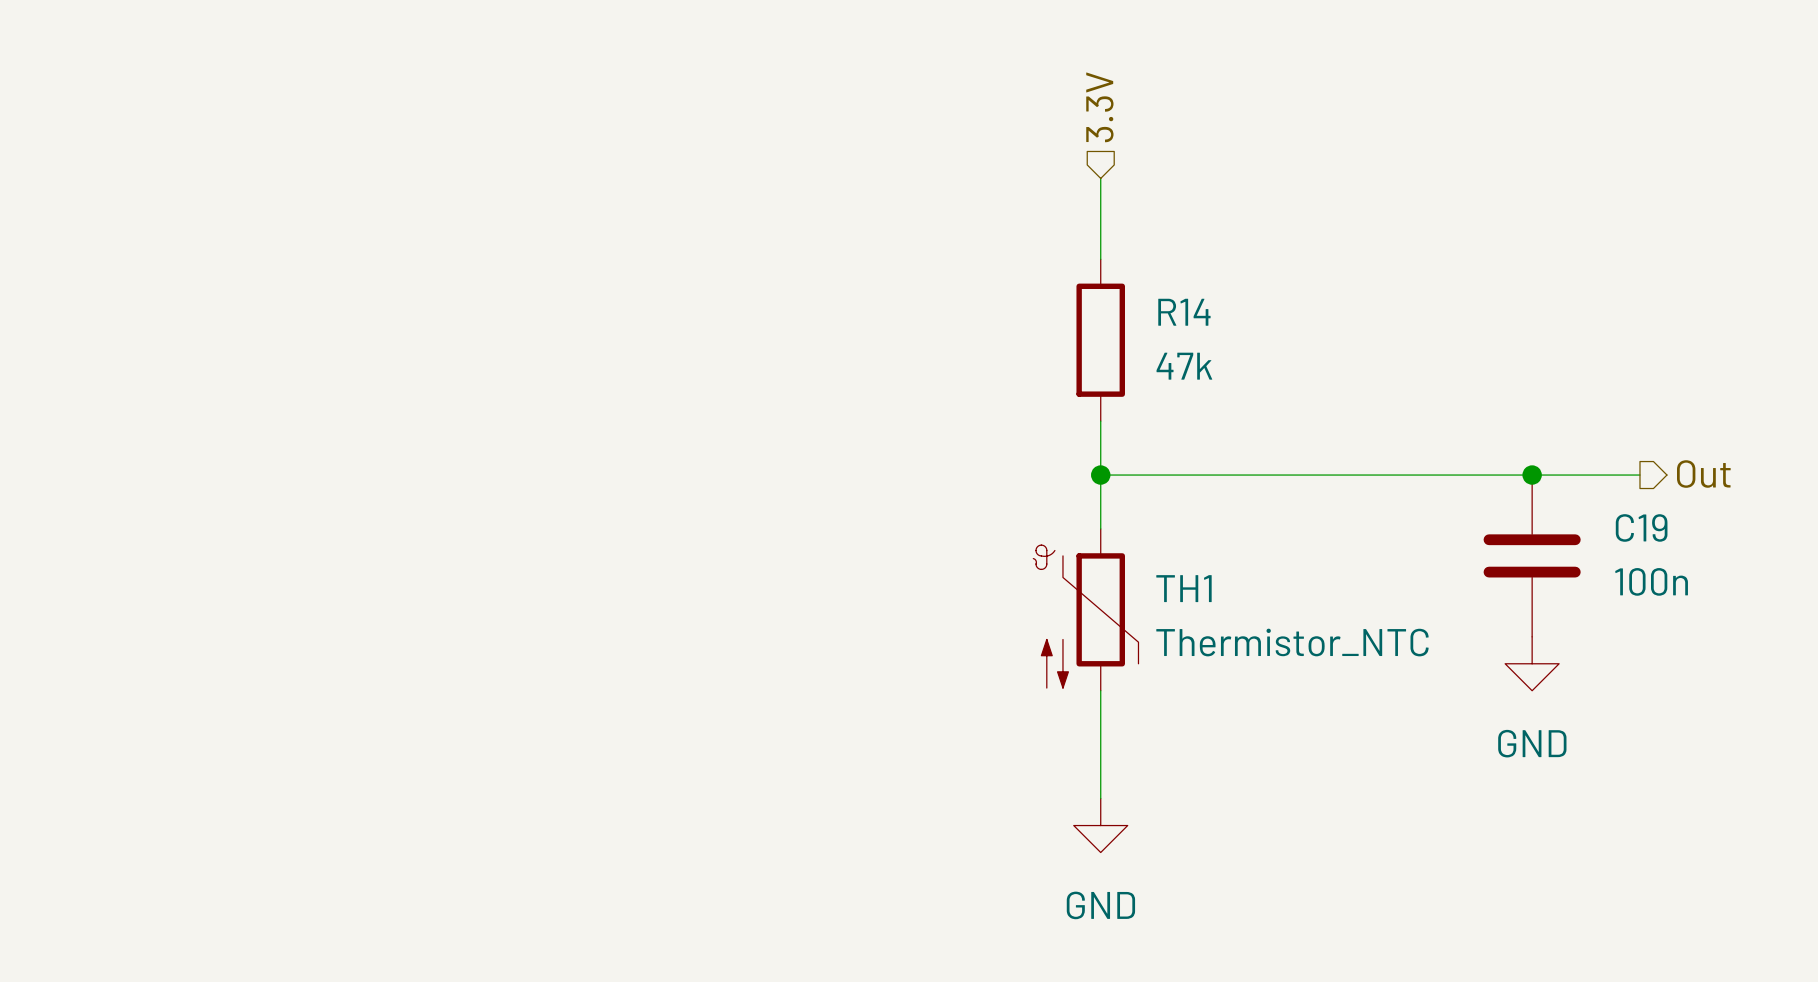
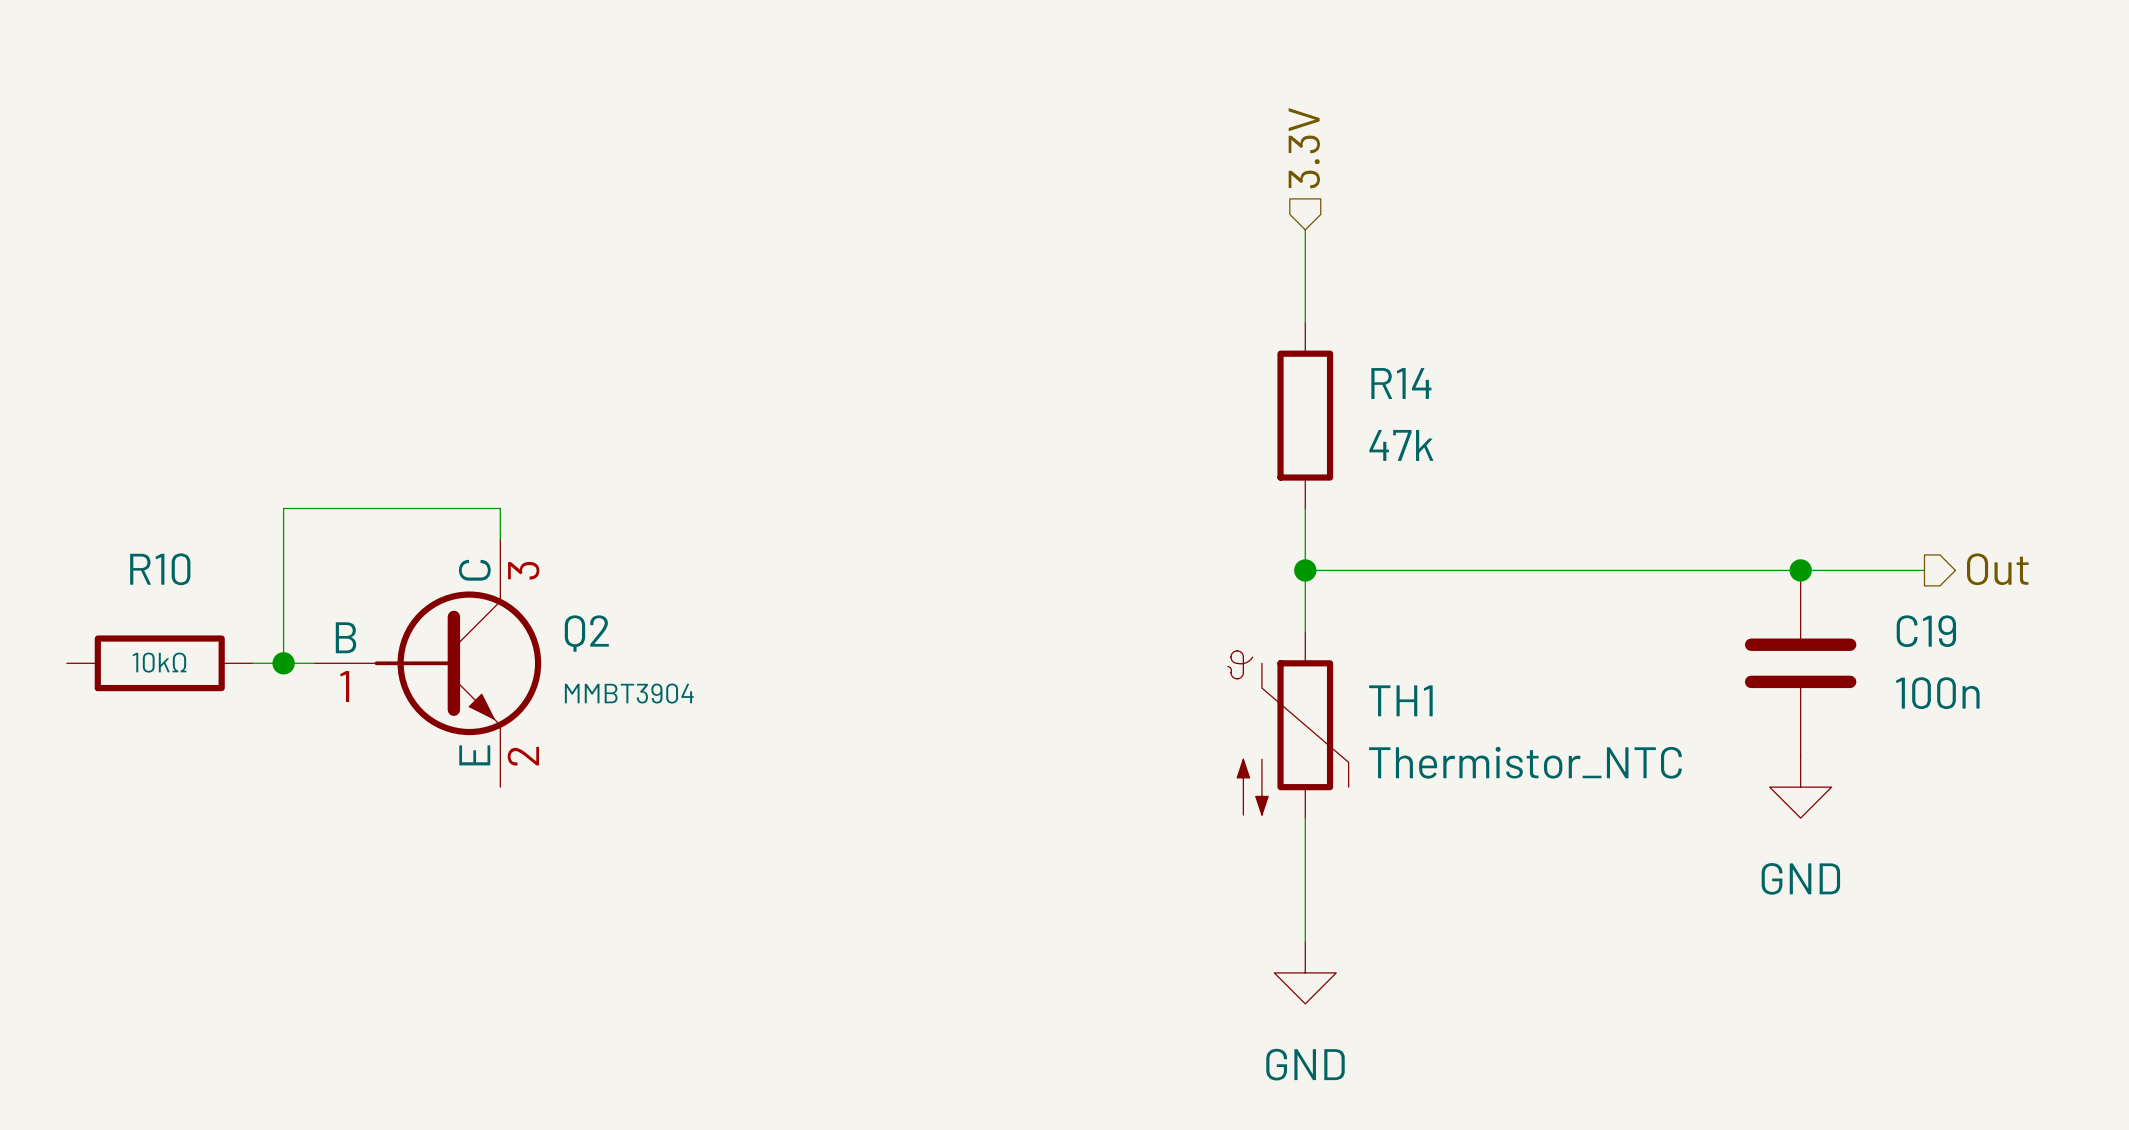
wire: none -> (500, 539) (500, 508) (283, 508) (283, 663)
R10: none -> 10kΩ (159, 663)
wire: none -> (252, 663) (314, 663)
junction: none -> (283, 663)
Q2: none -> MMBT3904 (427, 663)

